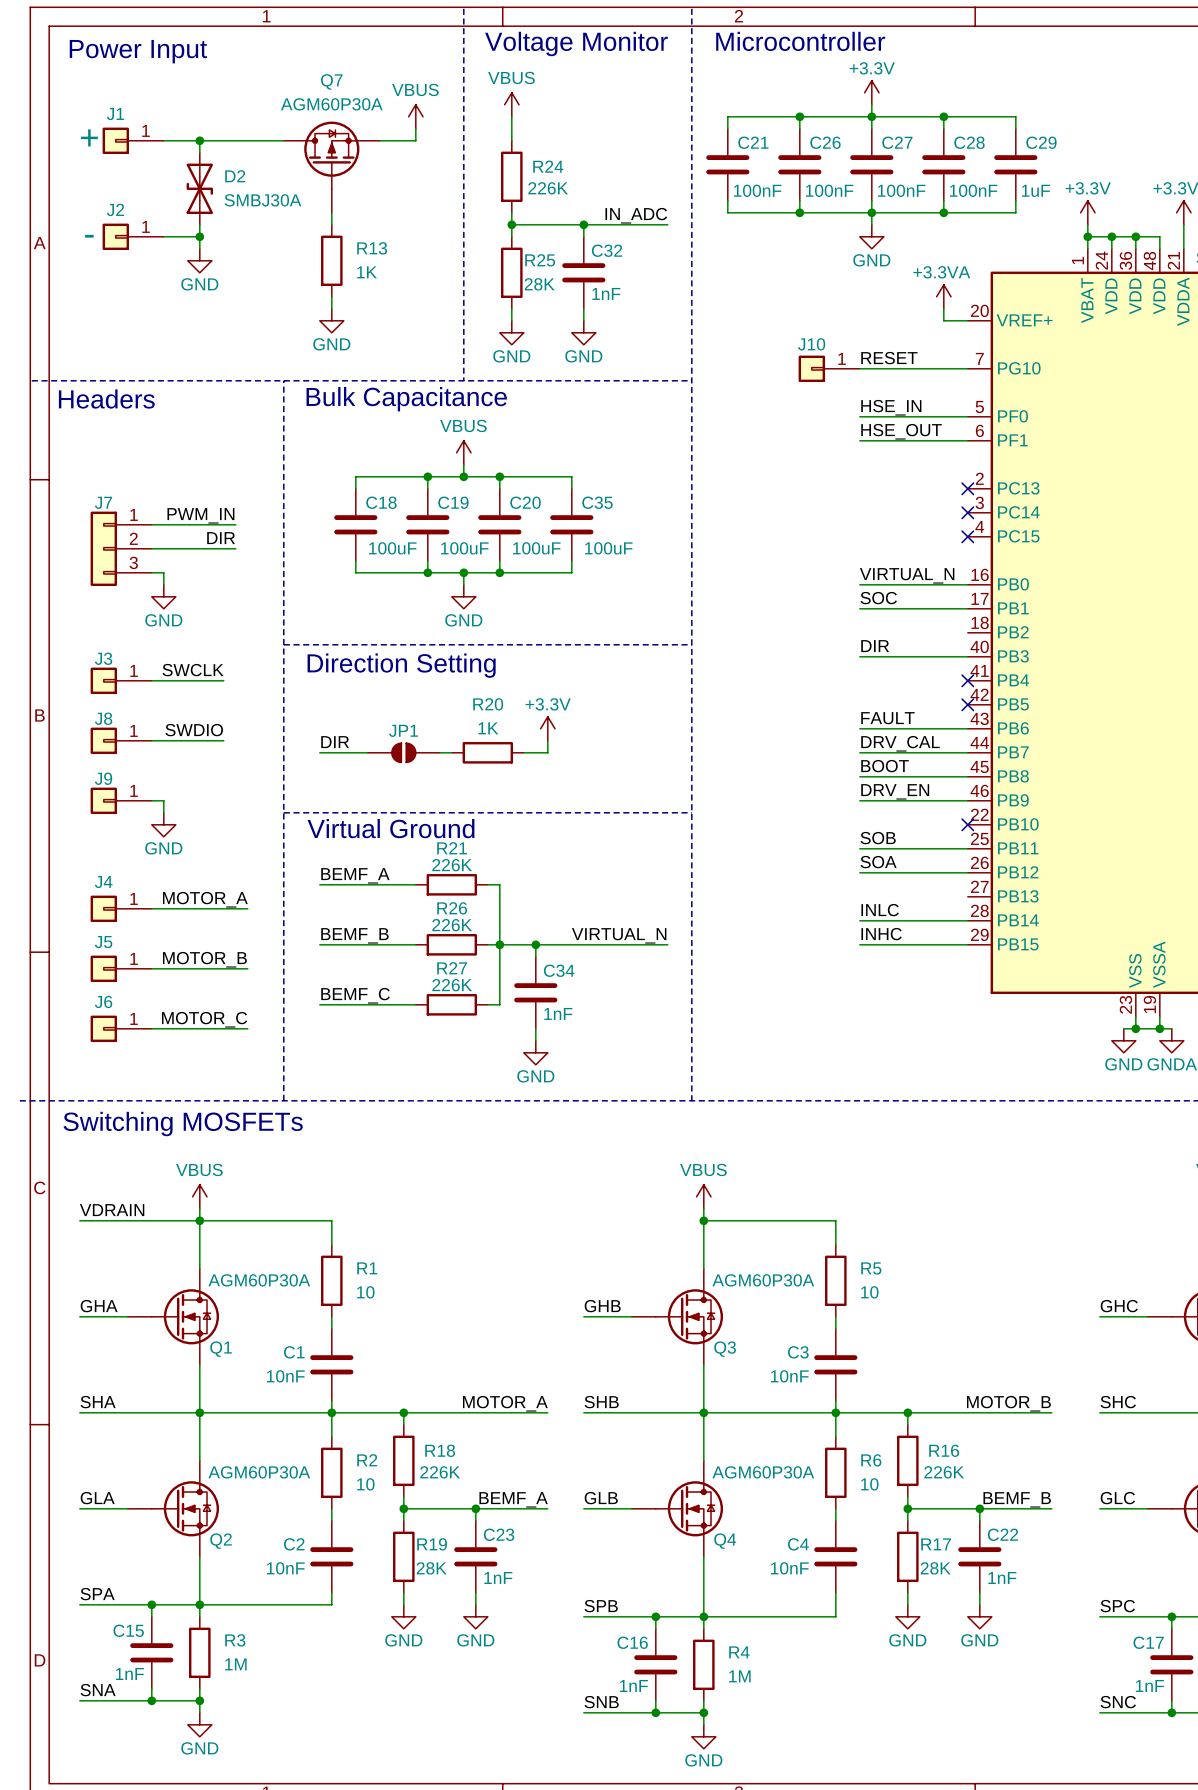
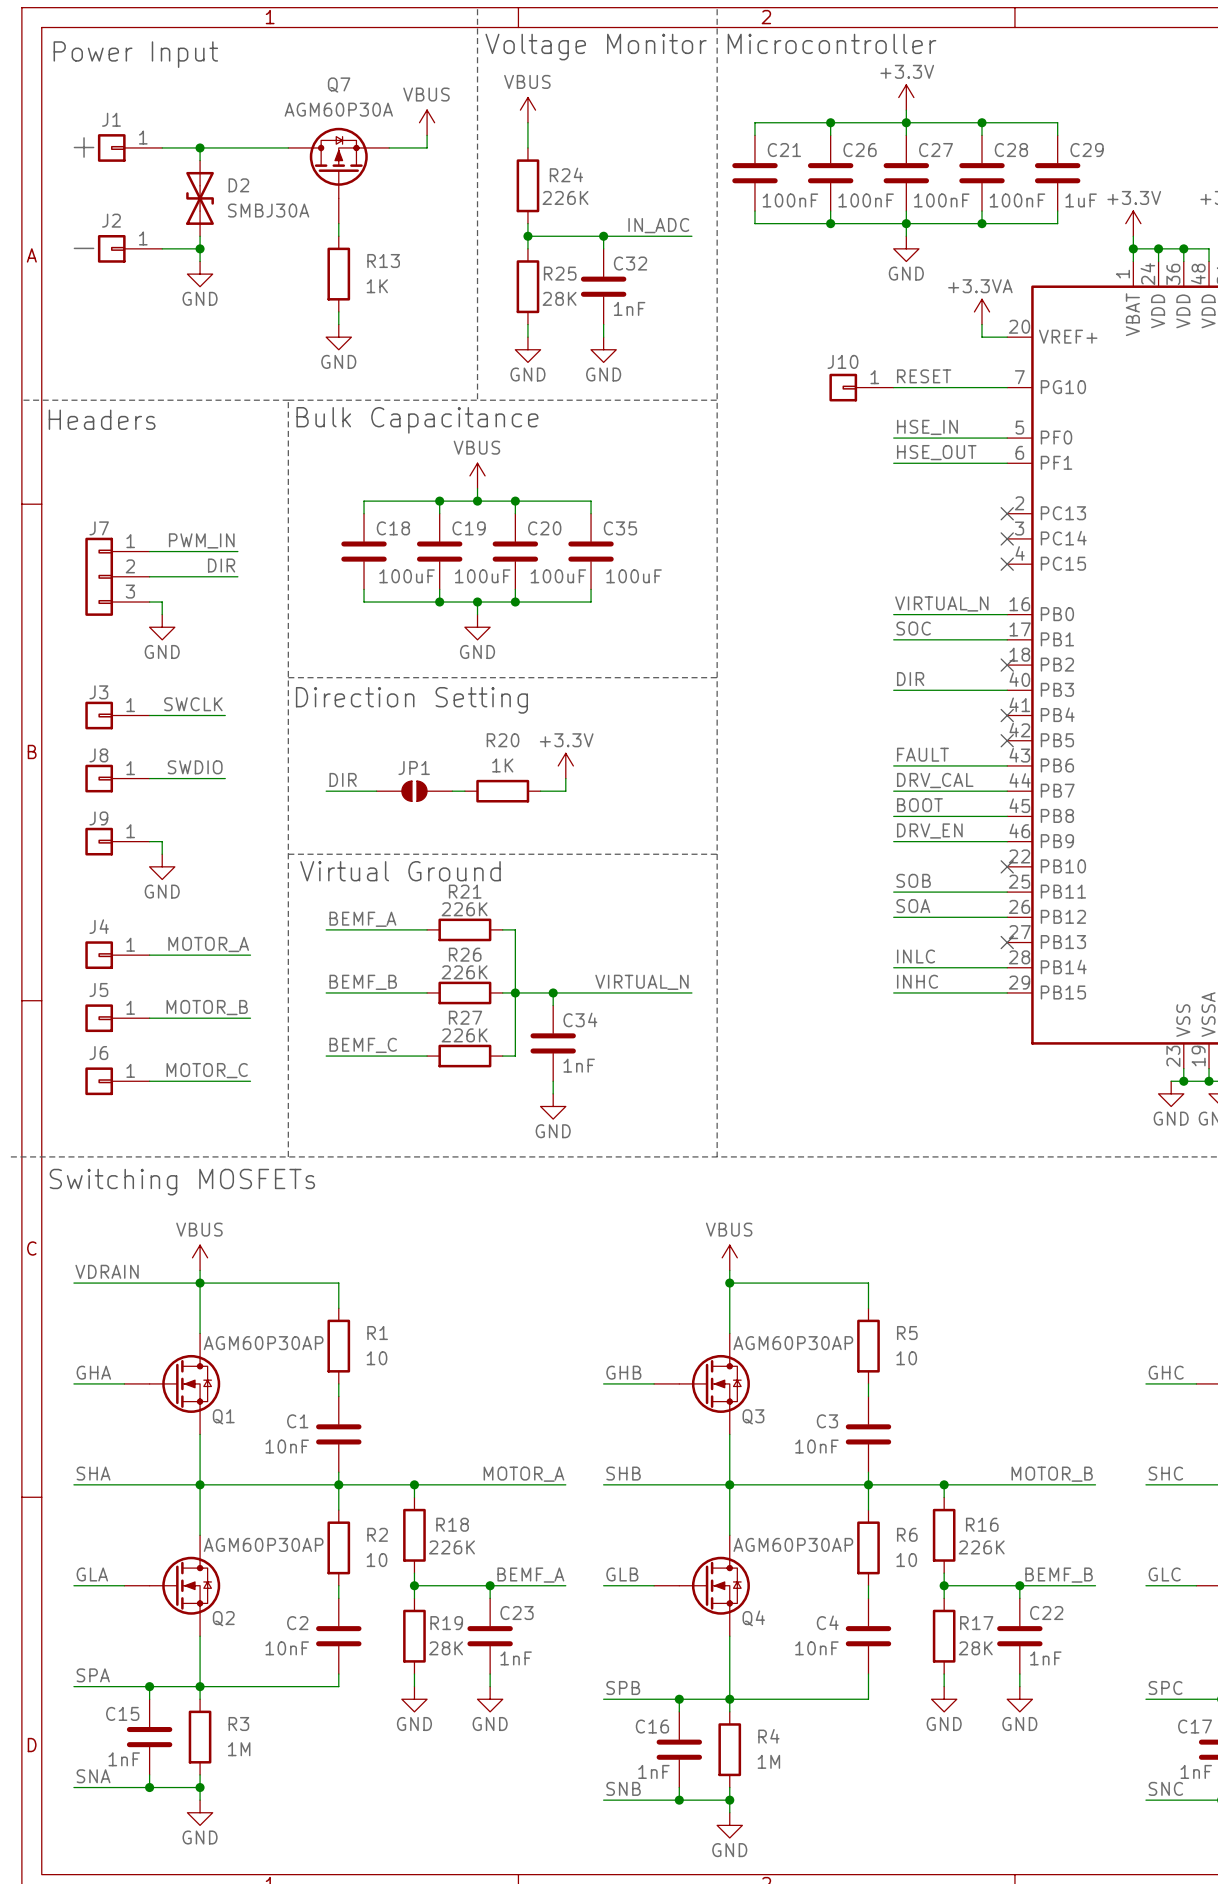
no-connect mark: none -> (1007, 665)
no-connect mark: none -> (1007, 942)
Q1 value: AGM60P30A (259, 1280) -> AGM60P30AP (263, 1343)
Q3 value: AGM60P30A (763, 1280) -> AGM60P30AP (793, 1343)
Q2 value: AGM60P30A (259, 1472) -> AGM60P30AP (263, 1544)
Q4 value: AGM60P30A (763, 1472) -> AGM60P30AP (793, 1544)

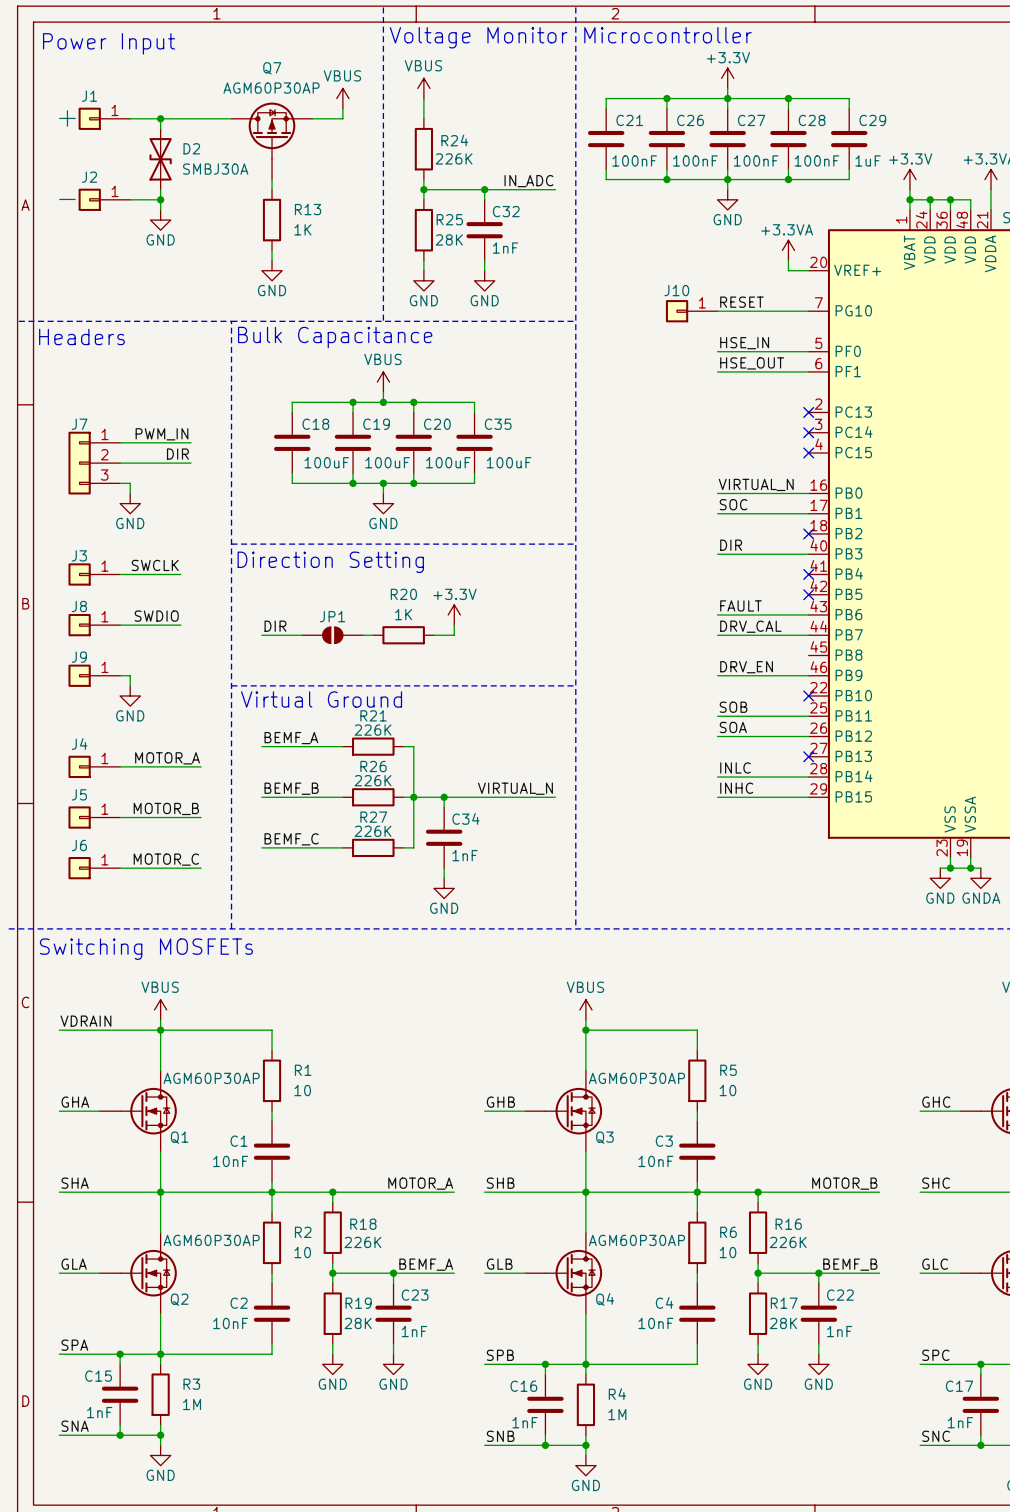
Q7 value: AGM60P30A (338, 109) -> AGM60P30AP (271, 88)
label: BOOT (919, 805) -> none
wire: (893, 816) (1007, 816) -> none

